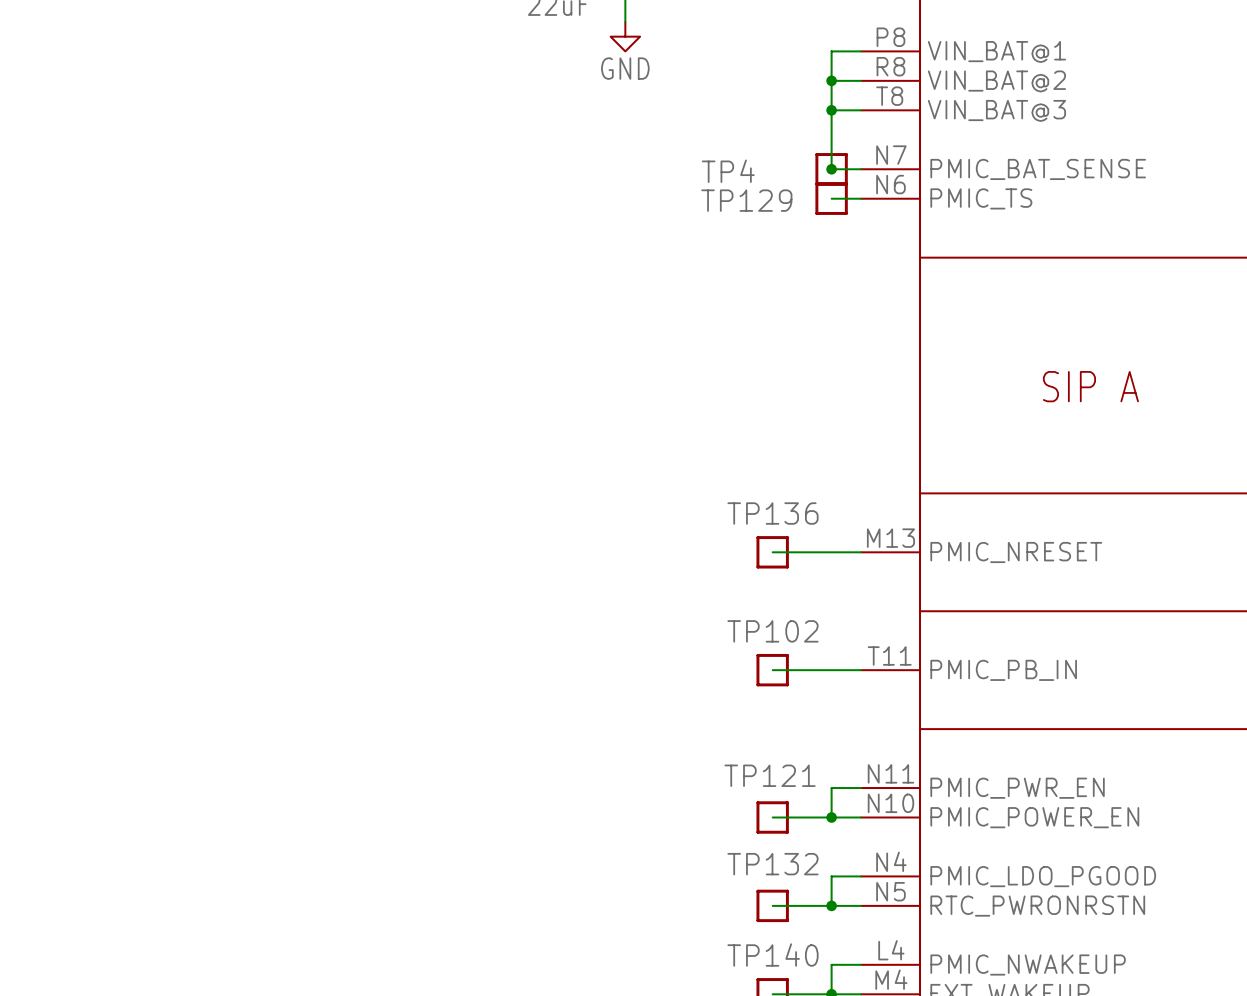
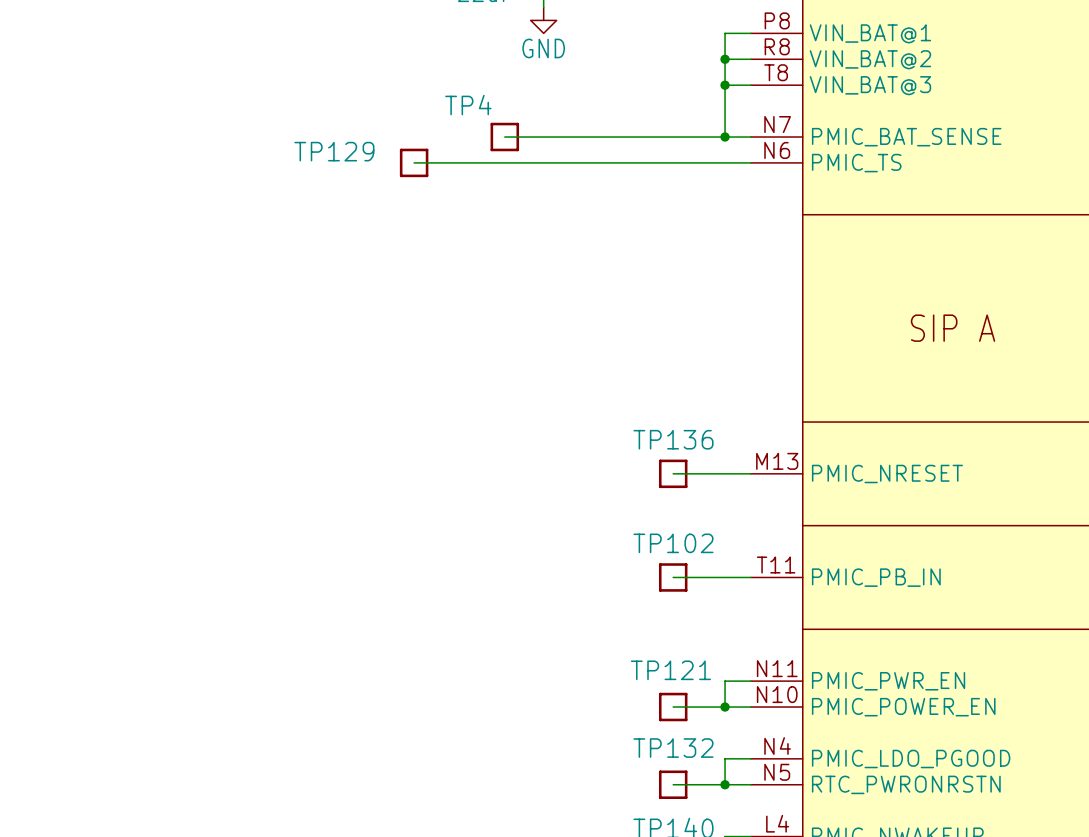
wire: none -> (504, 137) (725, 137)
TP4 position: (831, 169) -> (504, 137)
TP4 name position: TP4 (728, 171) -> TP4 (468, 105)
wire: none -> (414, 162) (725, 162)
TP129 position: (831, 198) -> (414, 162)
TP129 name position: TP129 (746, 200) -> TP129 (334, 151)

